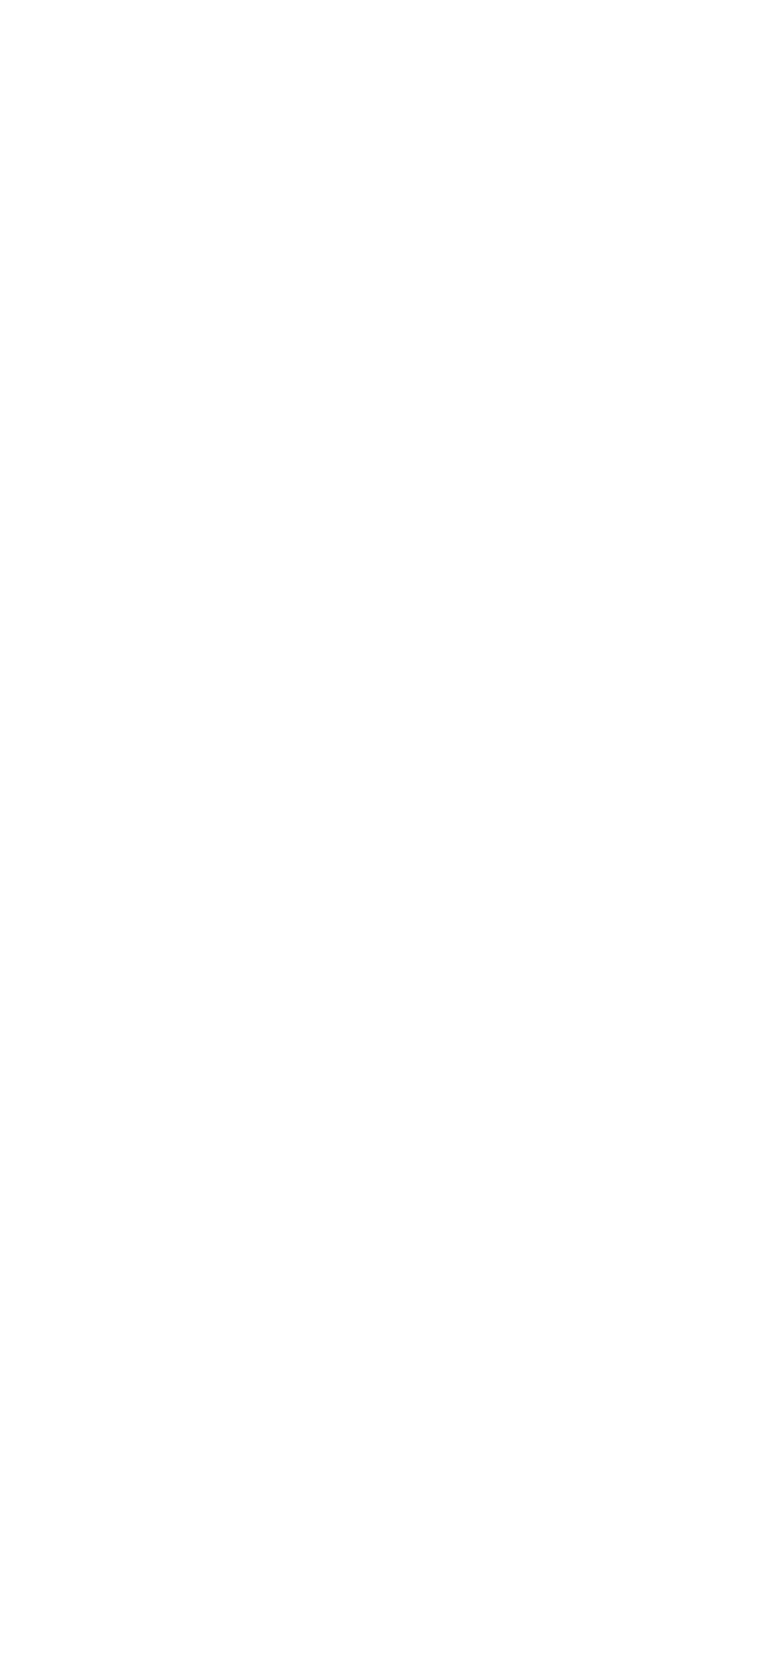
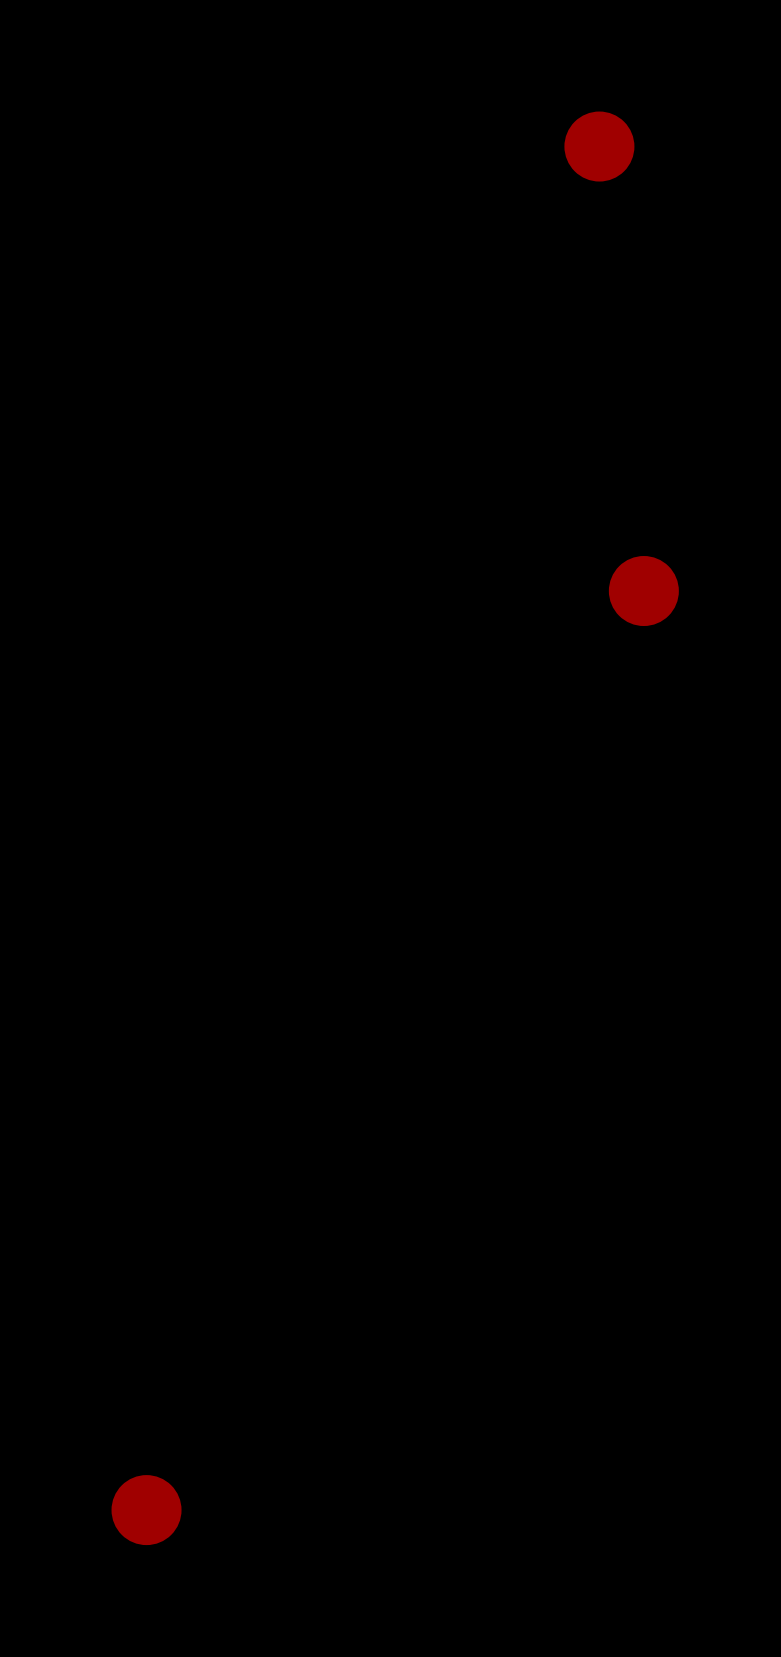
part: none -> (599, 146)
part: none -> (643, 591)
part: none -> (146, 1510)

